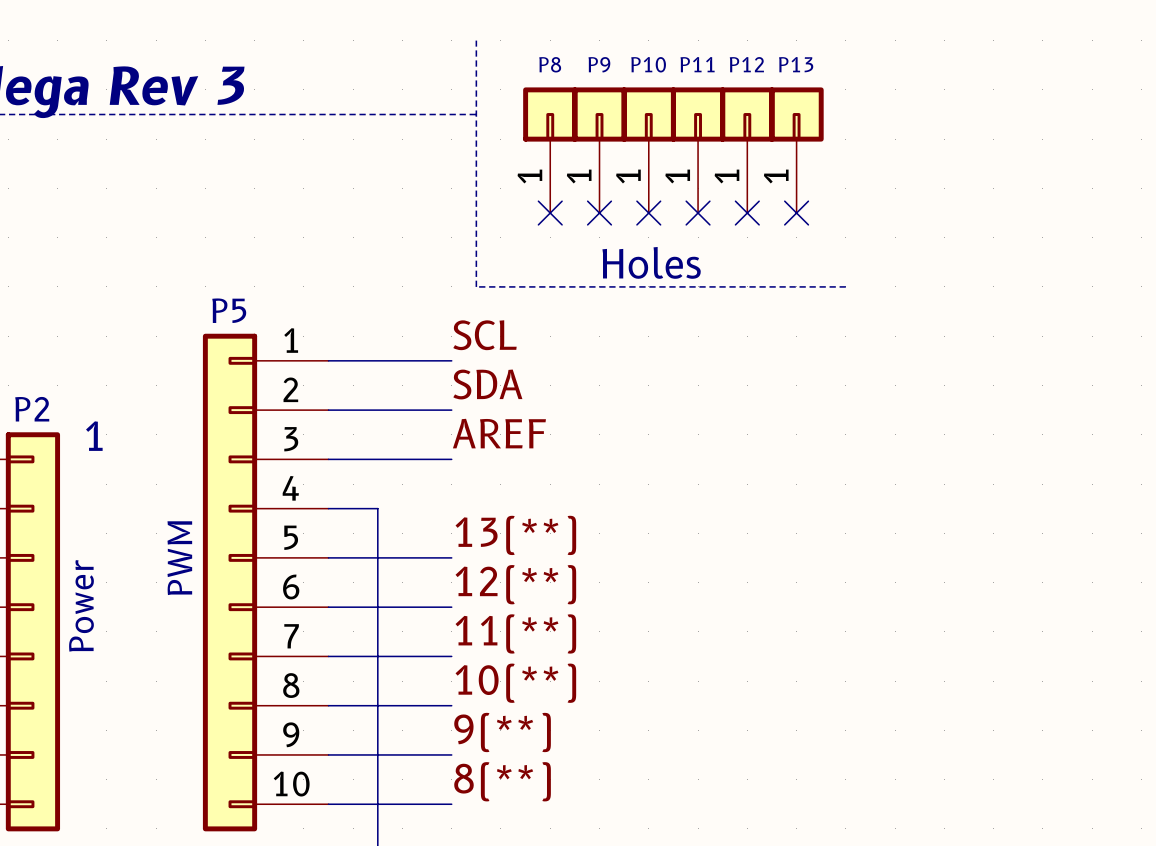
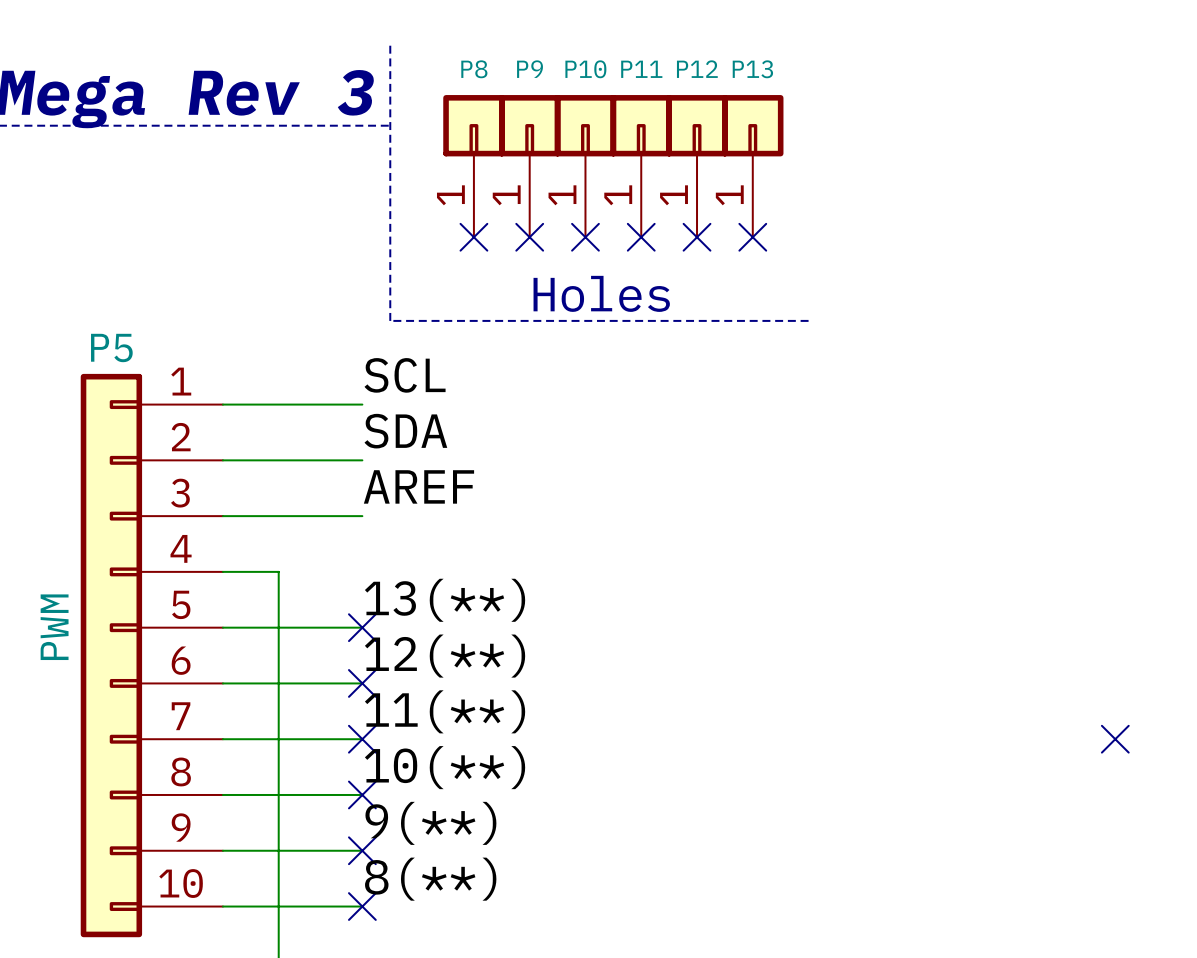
no-connect mark: none -> (362, 627)
no-connect mark: none -> (362, 683)
no-connect mark: none -> (362, 739)
no-connect mark: none -> (1115, 739)
no-connect mark: none -> (362, 794)
no-connect mark: none -> (362, 850)
no-connect mark: none -> (362, 906)

